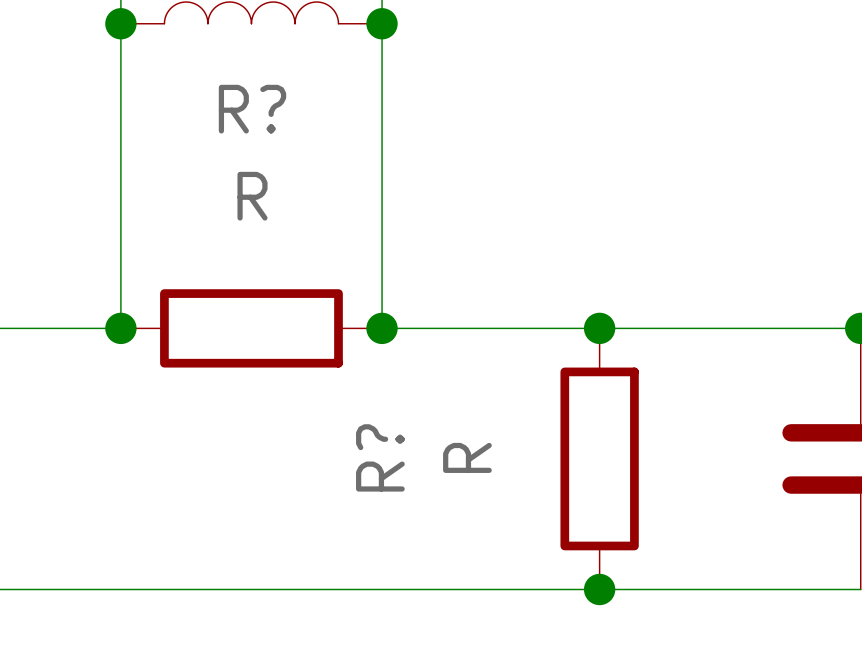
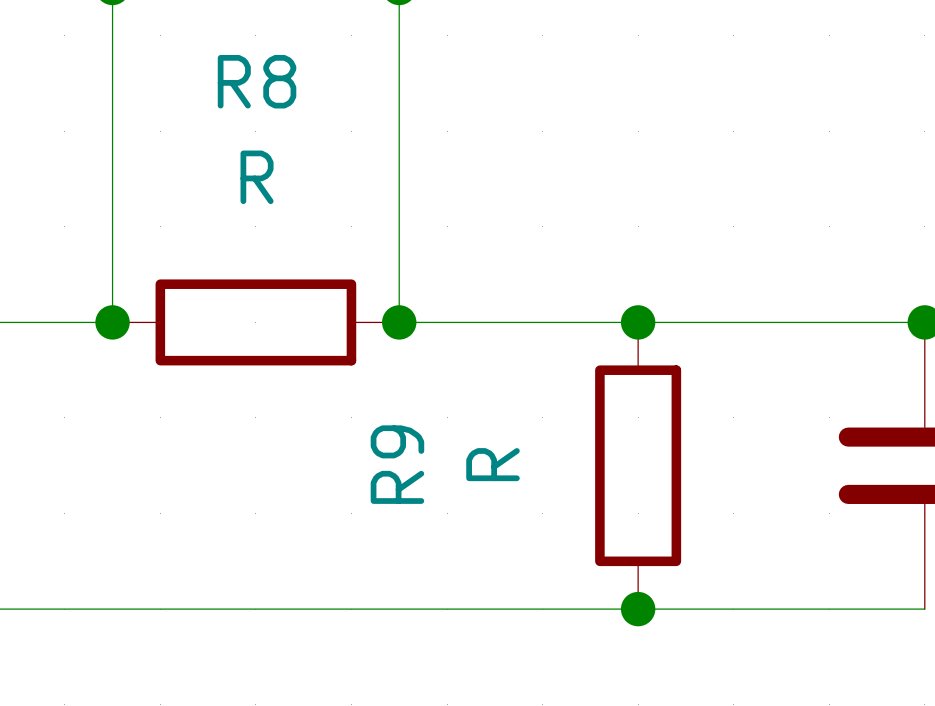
R? name: R? (252, 109) -> R8 (257, 81)
R? name: R? (380, 457) -> R9 (397, 464)

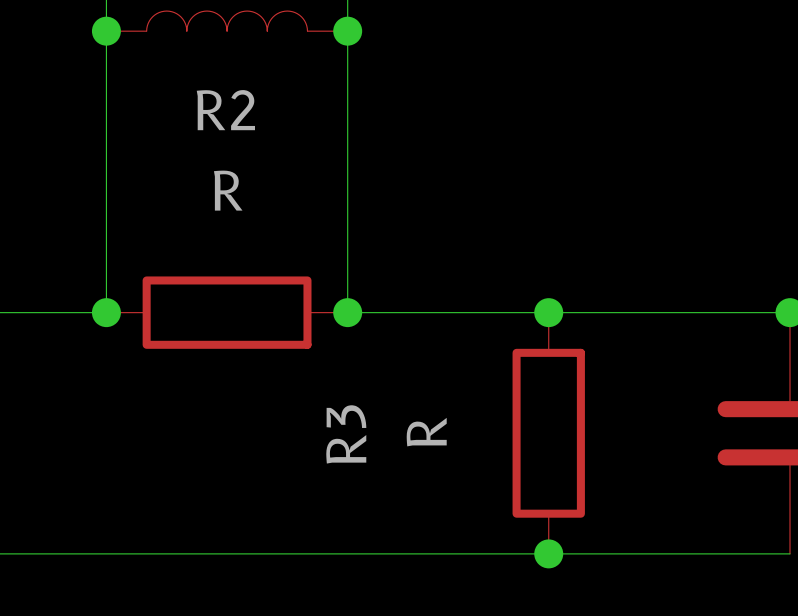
R8 name: R8 (257, 81) -> R2 (225, 110)
R9 name: R9 (397, 464) -> R3 (346, 434)

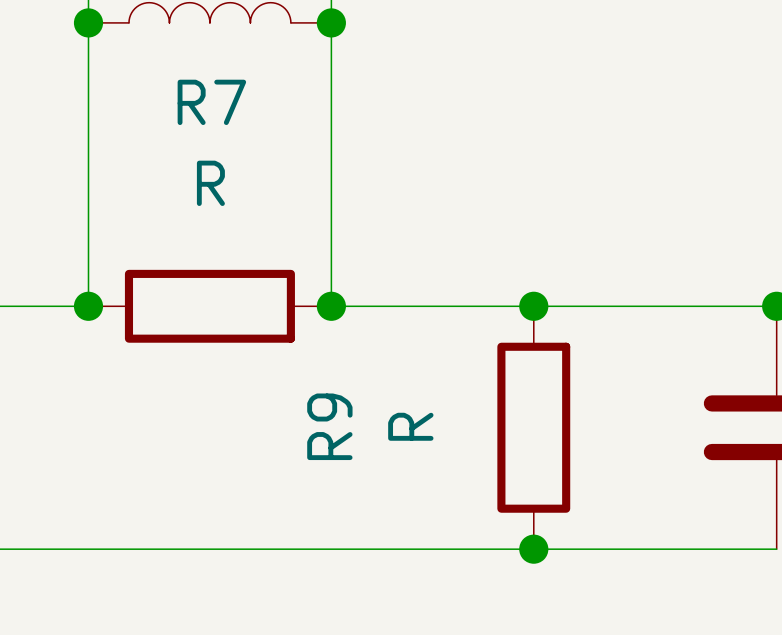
R2 name: R2 (225, 110) -> R7 (211, 102)
R3 name: R3 (346, 434) -> R9 (329, 426)

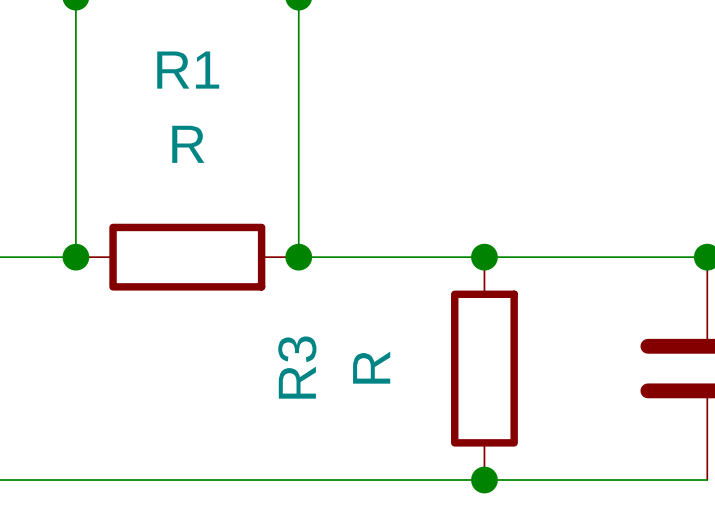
R7 name: R7 (211, 102) -> R1 (188, 70)
R9 name: R9 (329, 426) -> R3 (297, 367)

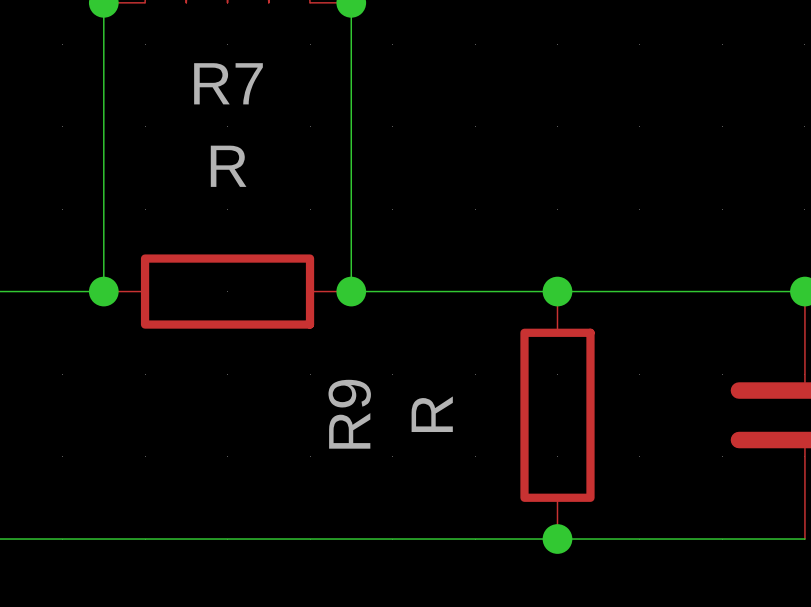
R1 name: R1 (188, 70) -> R7 (228, 83)
R3 name: R3 (297, 367) -> R9 (349, 414)

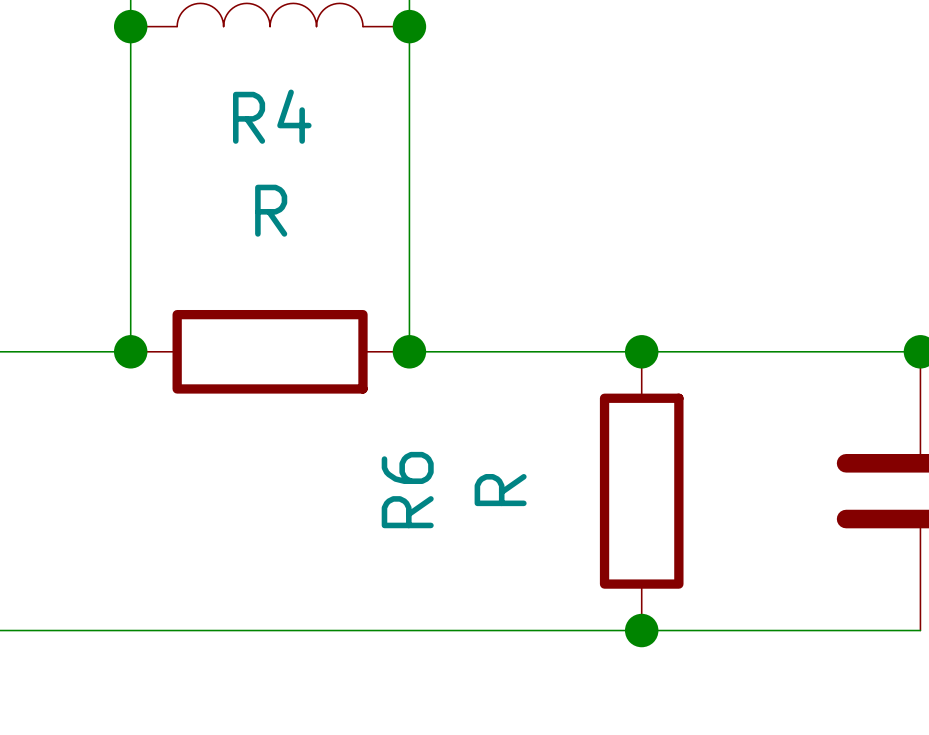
R7 name: R7 (228, 83) -> R4 (272, 116)
R9 name: R9 (349, 414) -> R6 (407, 490)

